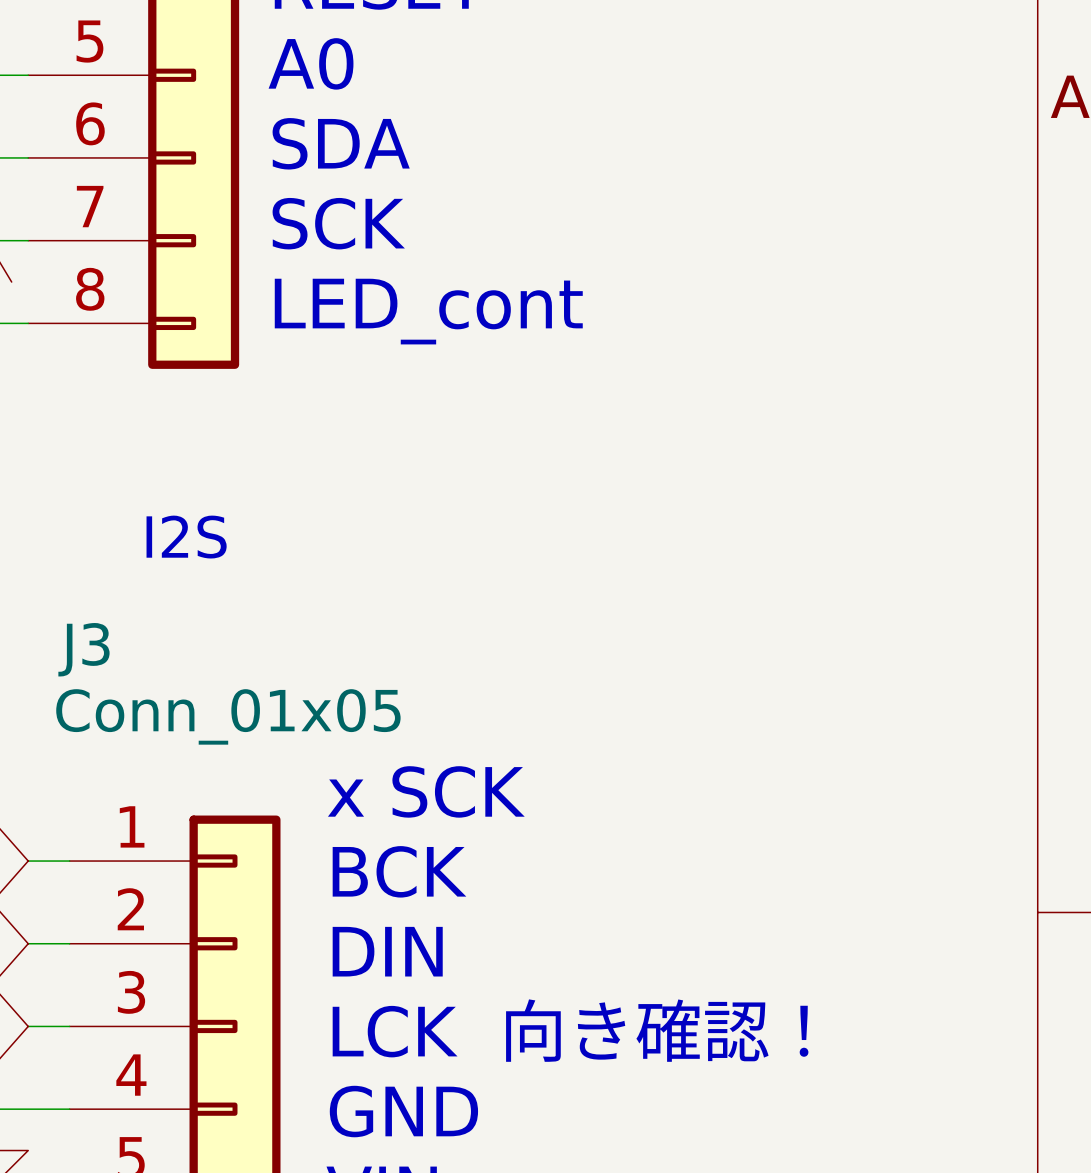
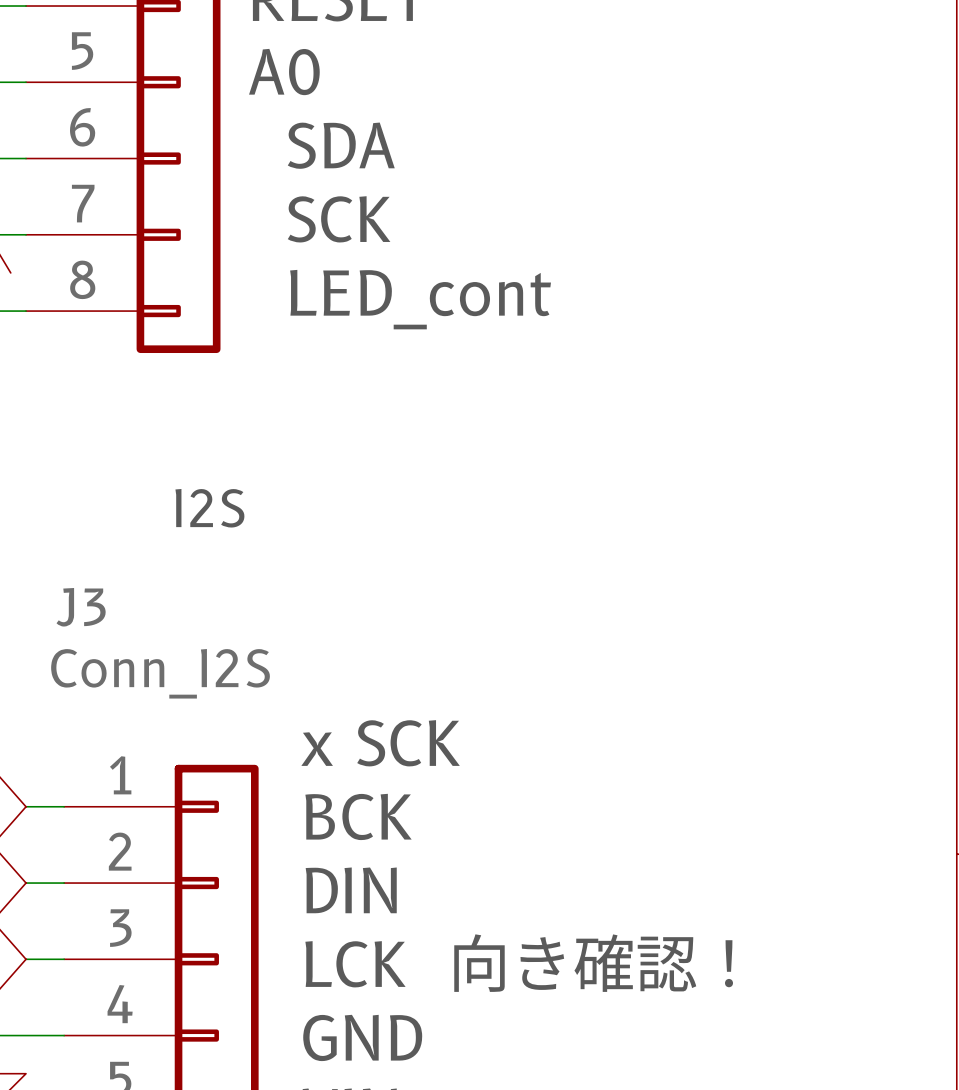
text position: SDA (341, 143) -> SDA (341, 145)
text position: SCK (338, 223) -> SCK (339, 219)
text position: LED_cont (428, 311) -> LED_cont (420, 299)
text position: I2S (186, 537) -> I2S (209, 508)
J3 value: Conn_01x05 (228, 716) -> Conn_I2S (160, 673)

